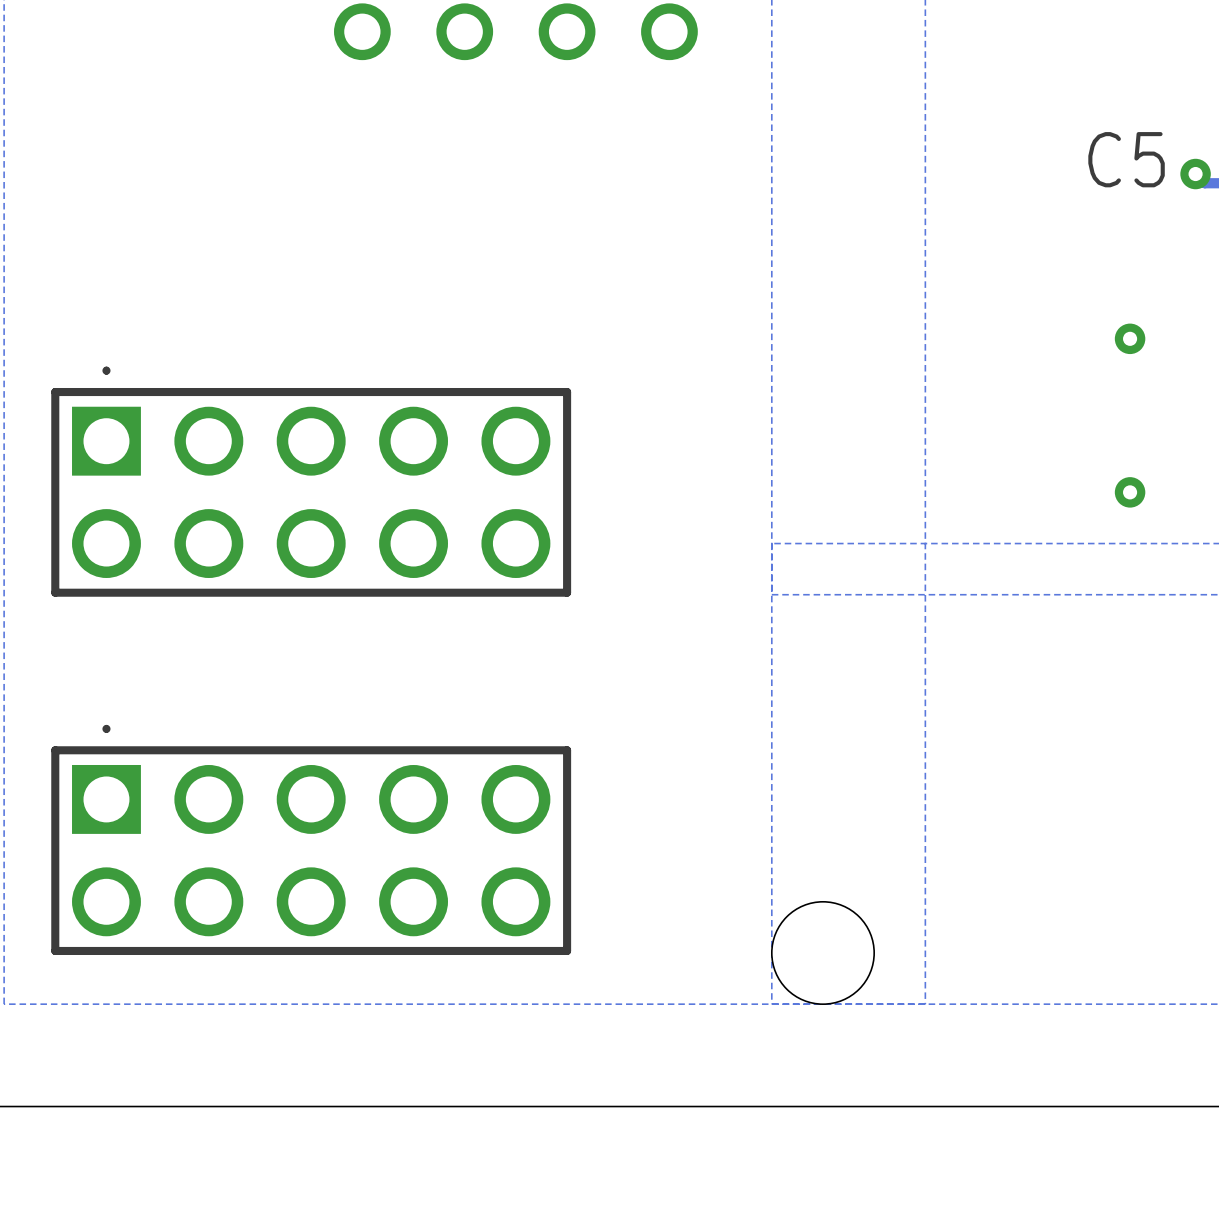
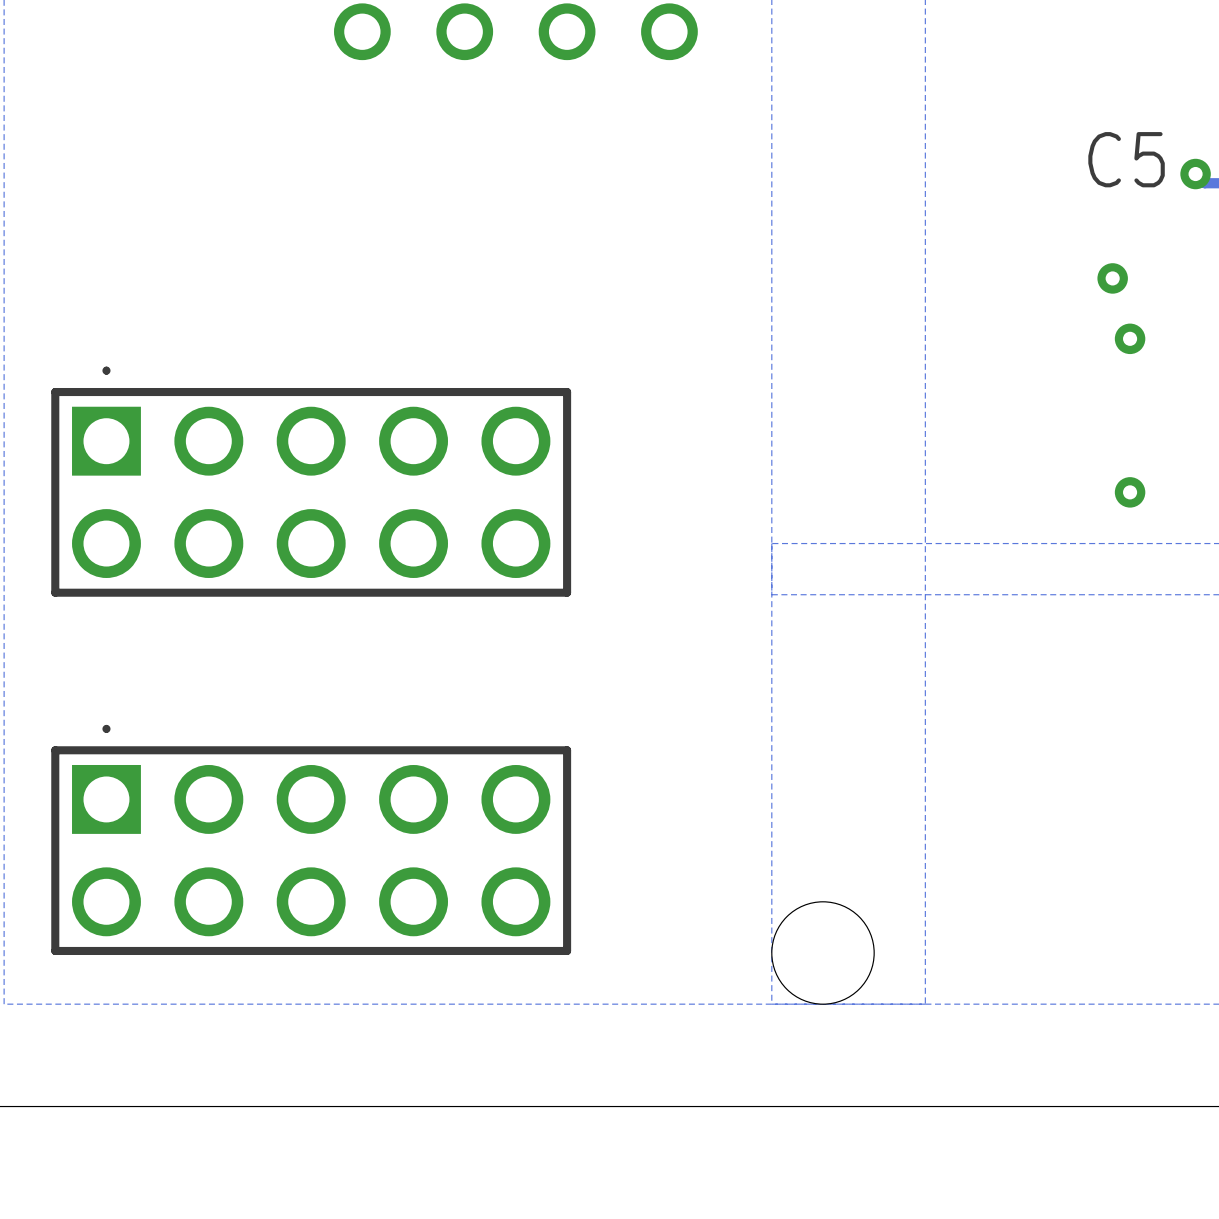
via: none -> (1112, 278)

